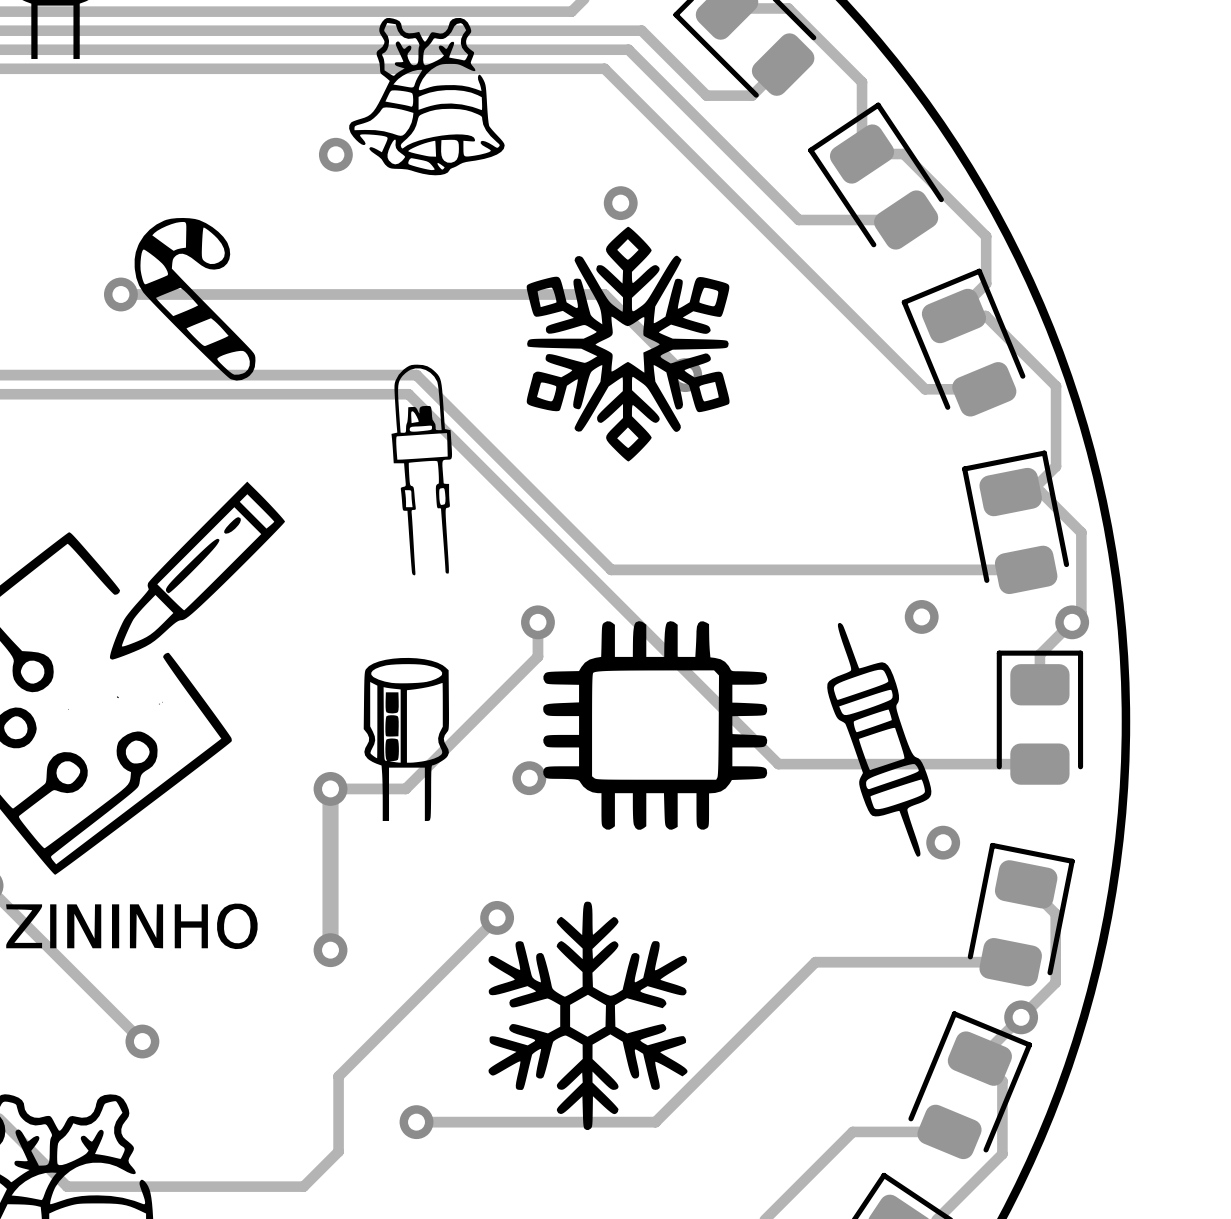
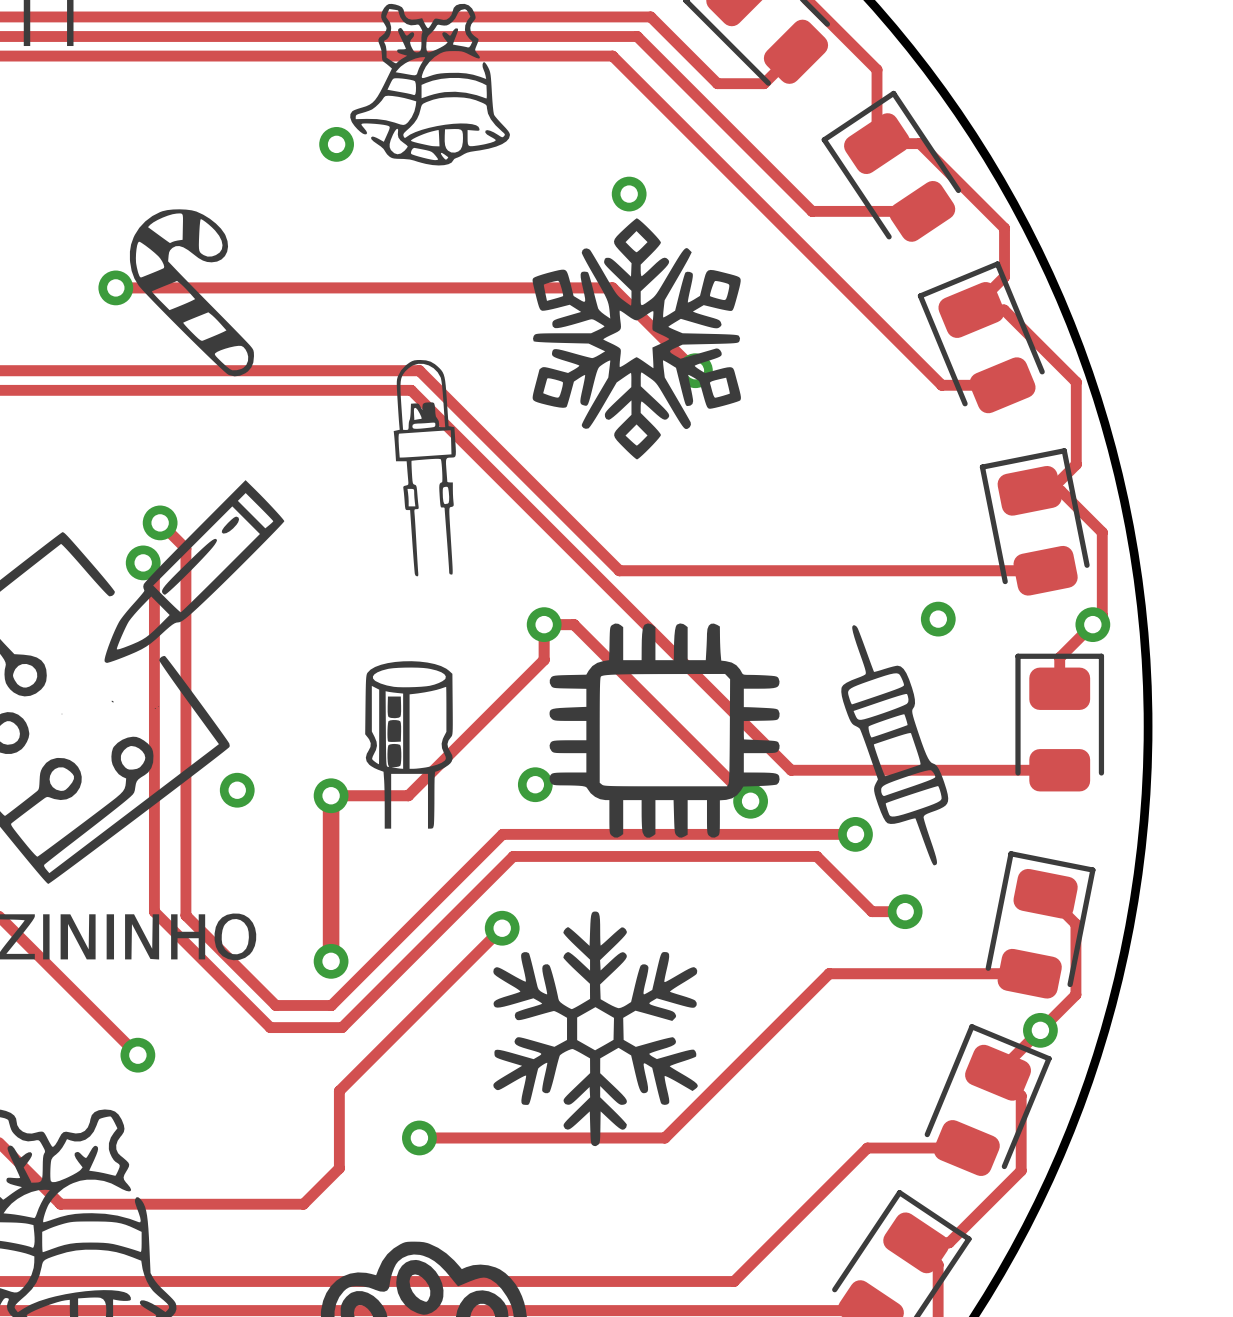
track: none -> (160, 522) (185, 548) (185, 915) (275, 1005) (331, 1005) (502, 834) (855, 834)
via: none -> (160, 522)
track: none -> (143, 562) (154, 574) (154, 911) (270, 1027) (342, 1027) (513, 856) (816, 856) (872, 911) (905, 911)
via: none -> (143, 562)
track: none -> (544, 624) (573, 624) (750, 801)
via: none -> (237, 790)
via: none -> (750, 801)
via: none -> (855, 834)
via: (943, 842) -> none
via: none -> (905, 911)

